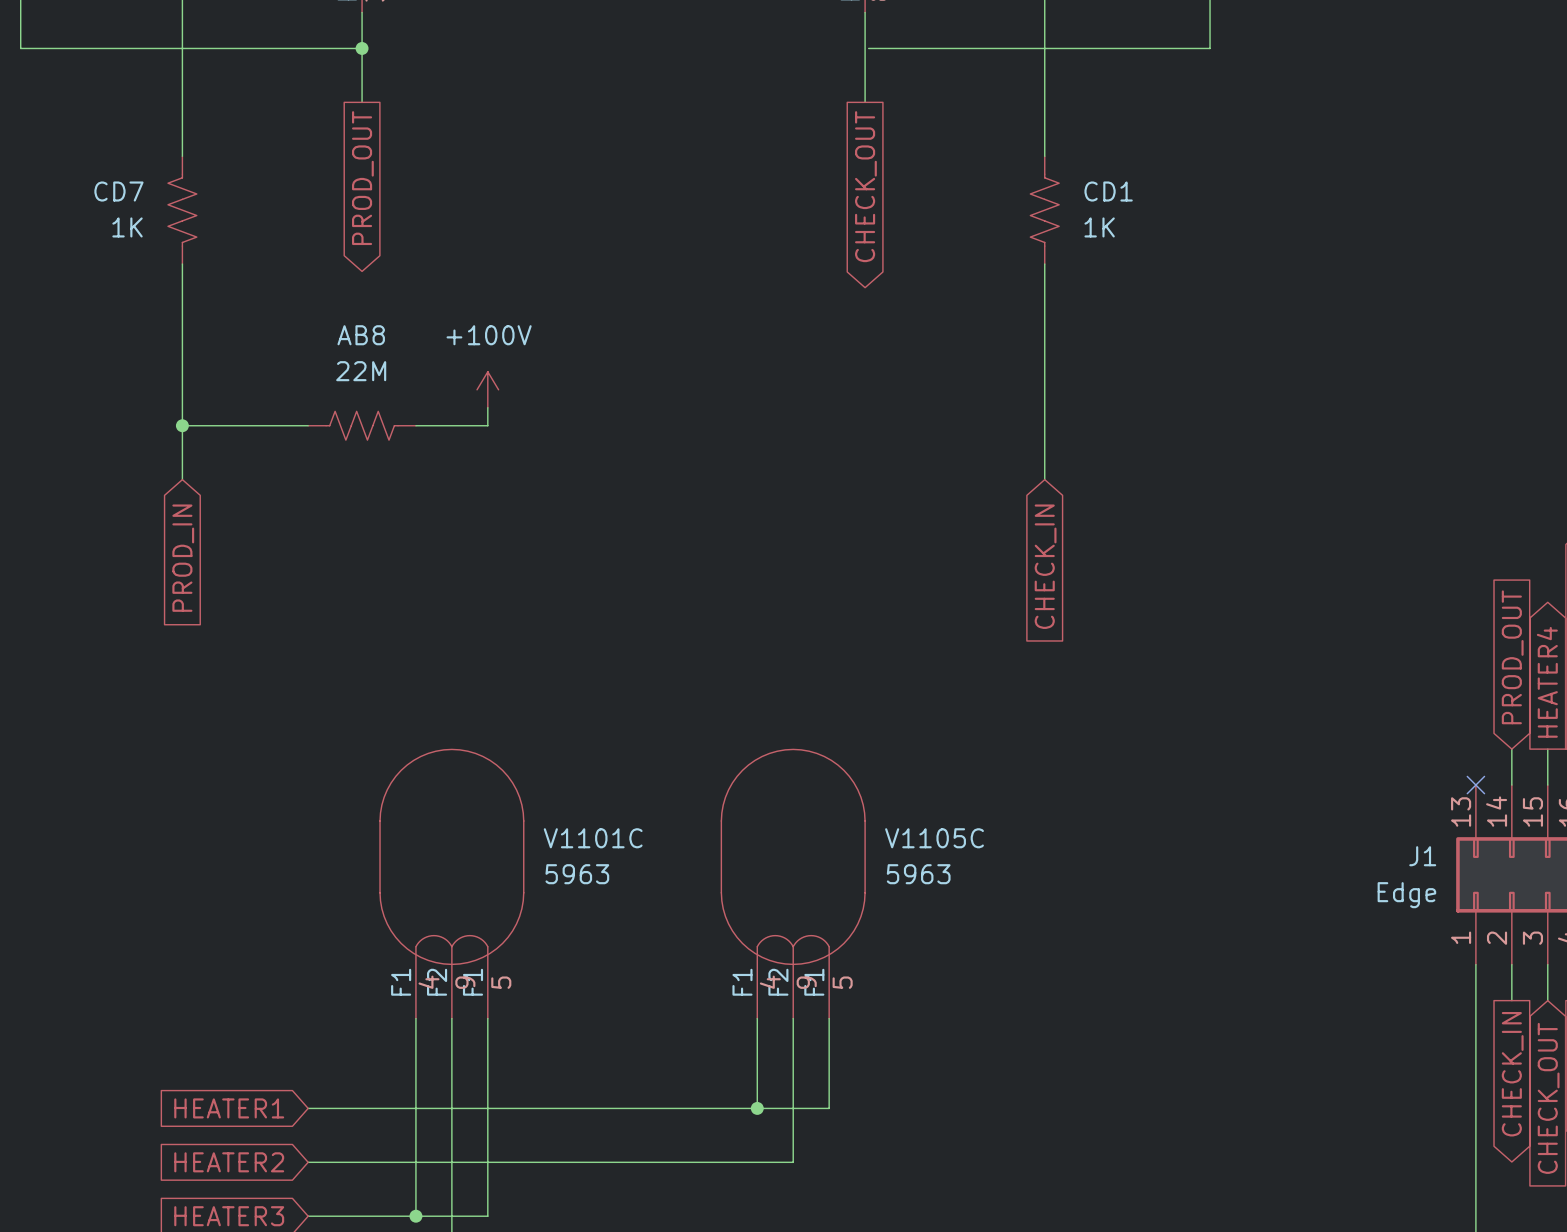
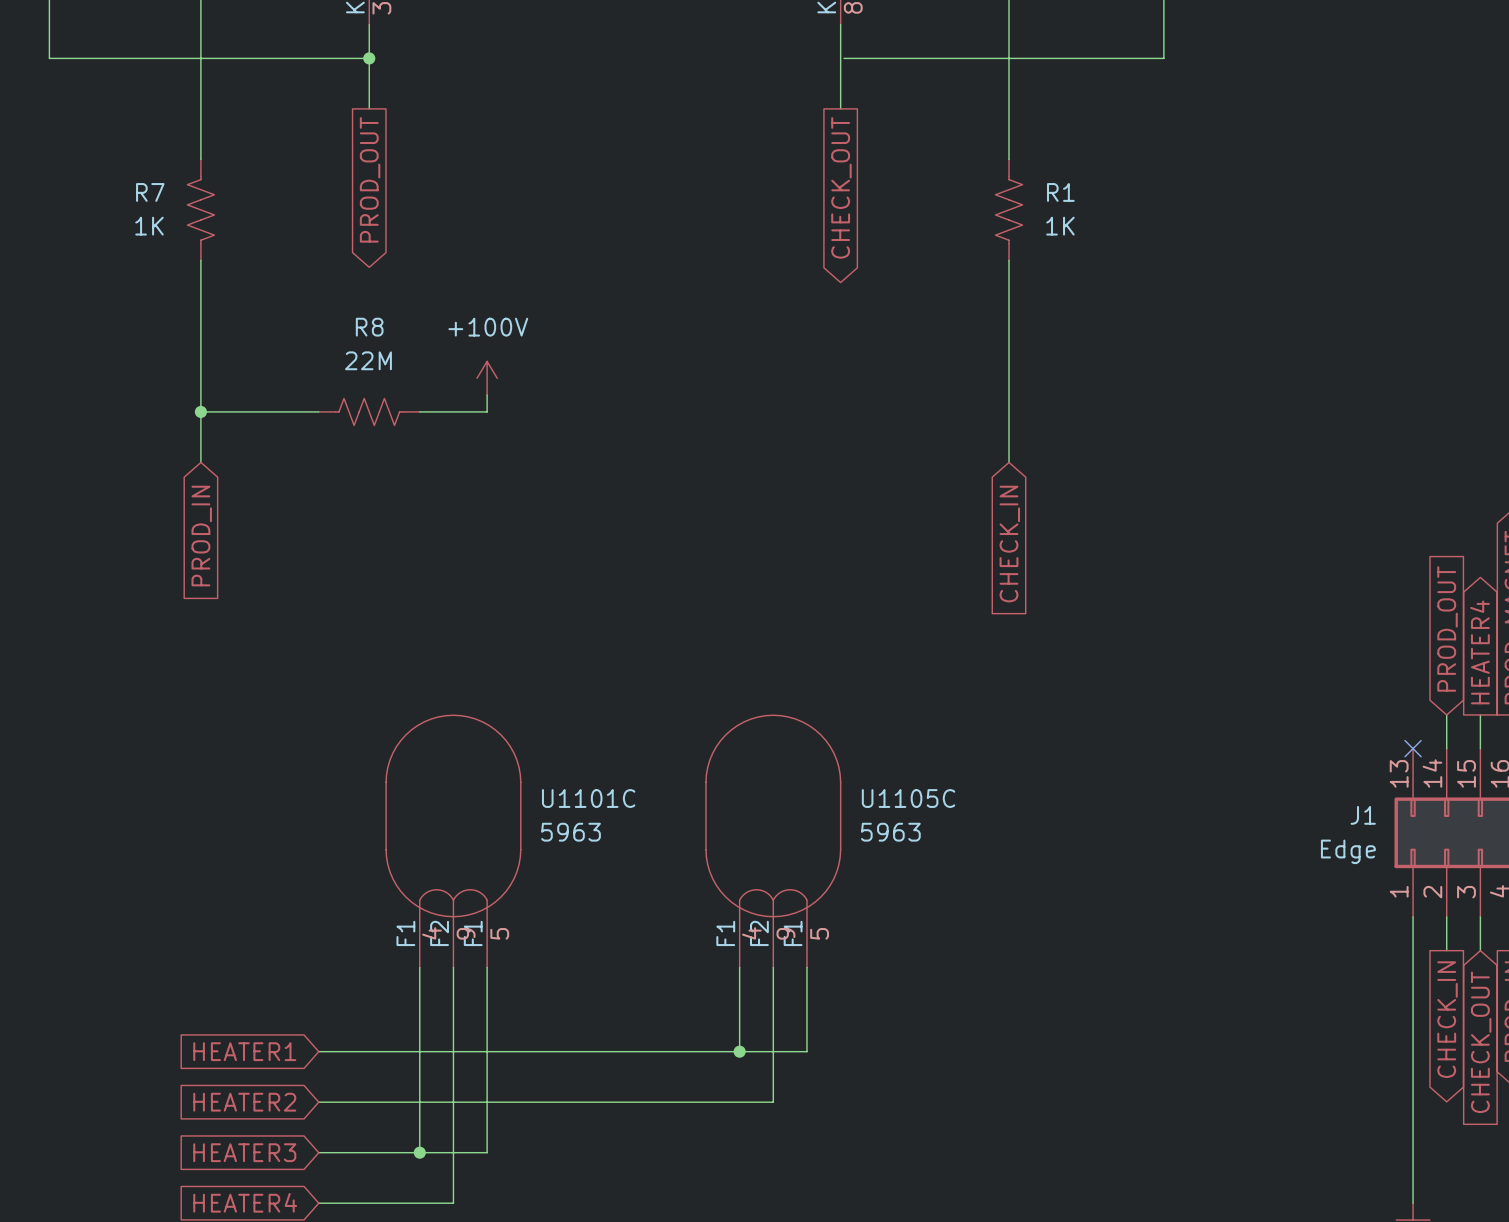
CD7 name: CD7 (118, 191) -> R7 (150, 192)
CD1 name: CD1 (1108, 191) -> R1 (1060, 192)
AB8 name: AB8 (361, 335) -> R8 (369, 327)
V1101C name: V1101C (593, 838) -> U1101C (588, 798)
V1105C name: V1105C (934, 838) -> U1105C (908, 798)

